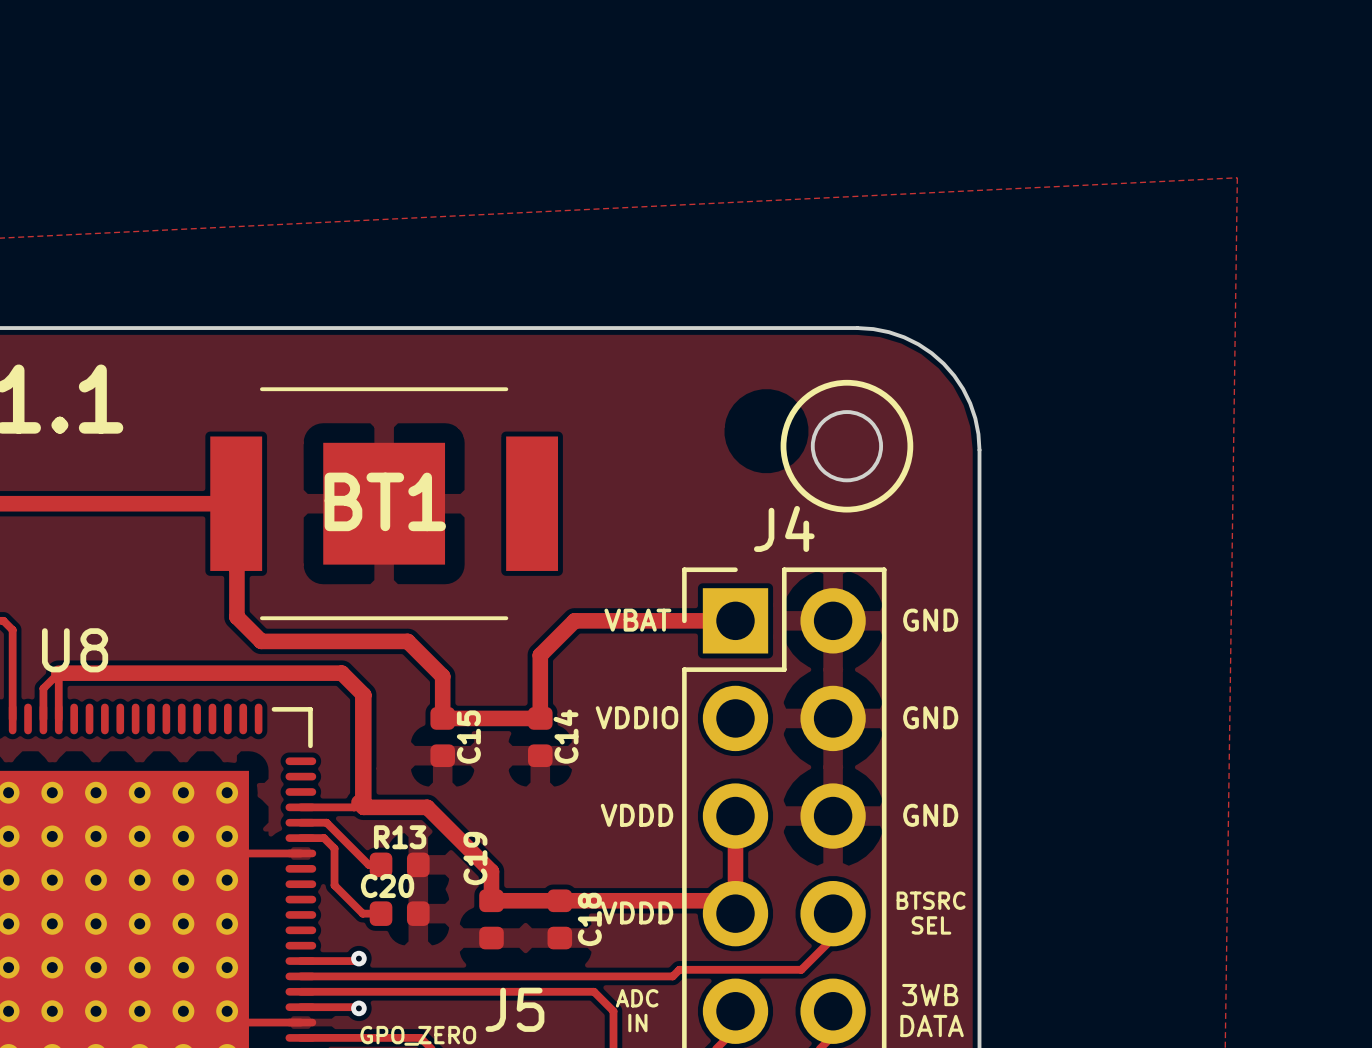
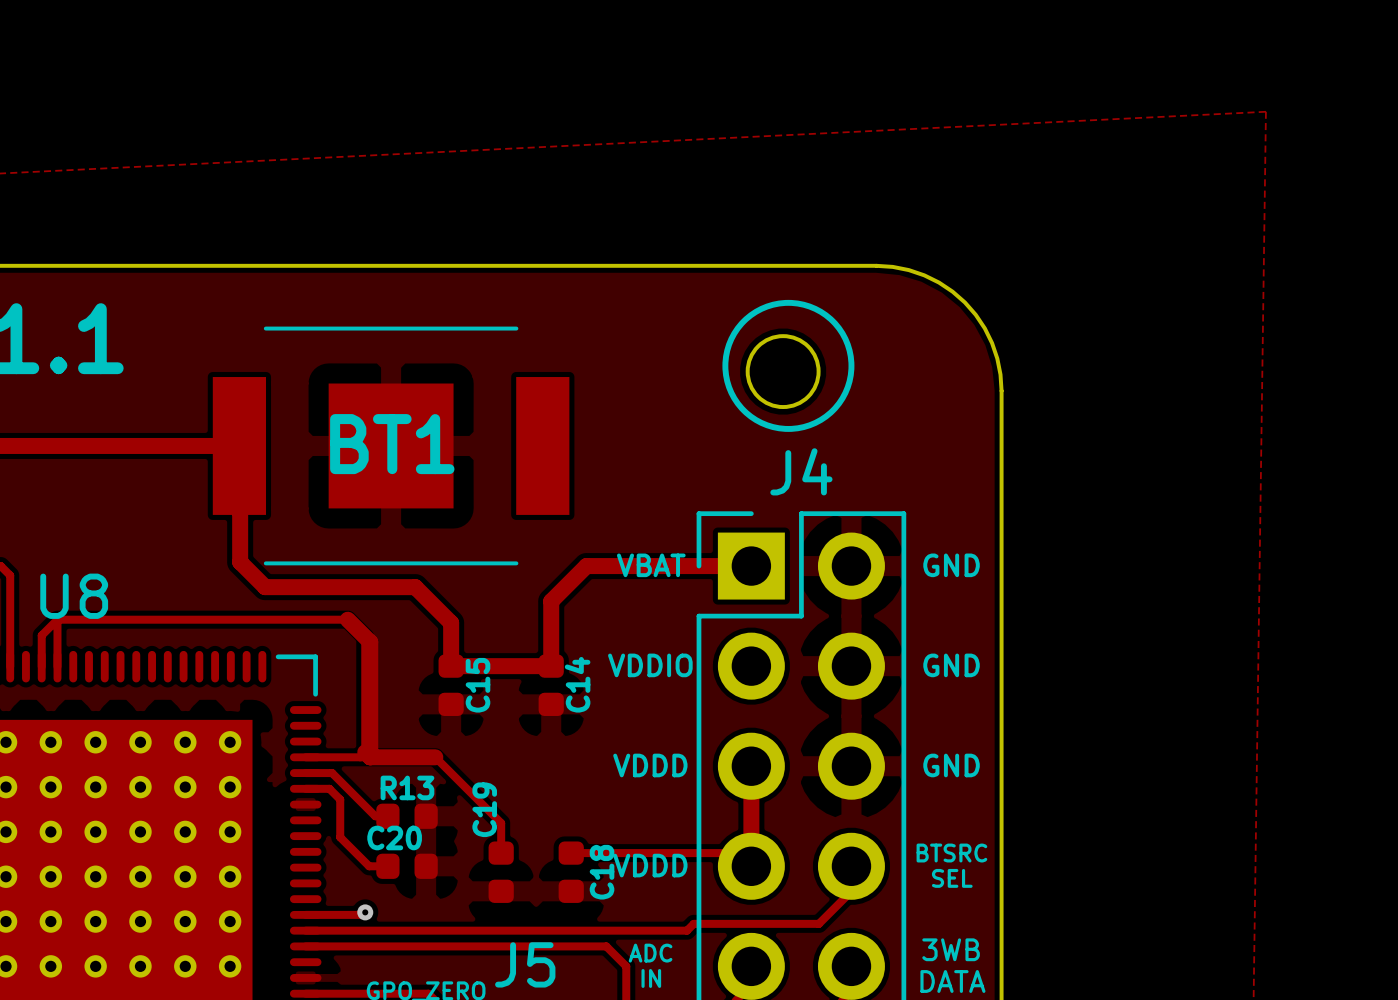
drawing: none -> [722, 299, 855, 432]
drawing: [780, 379, 914, 513] -> none
round board edge: none -> [745, 334, 821, 410]
round board edge: [810, 410, 884, 483] -> none
track width: thick (58, 673) (341, 673) -> thin (57, 619) (347, 619)
track width: thick (427, 807) (491, 871) (491, 900) -> thin (435, 757) (501, 823) (501, 853)
track: (227, 836) (244, 853) (300, 853) -> none
track: (491, 900) (559, 900) -> none
track width: thick (559, 900) (722, 900) (735, 913) -> thin (571, 853) (738, 853) (751, 866)
track: (300, 1007) (358, 1008) -> none
via: (358, 1008) -> none
track: (227, 1011) (238, 1022) (300, 1022) -> none

